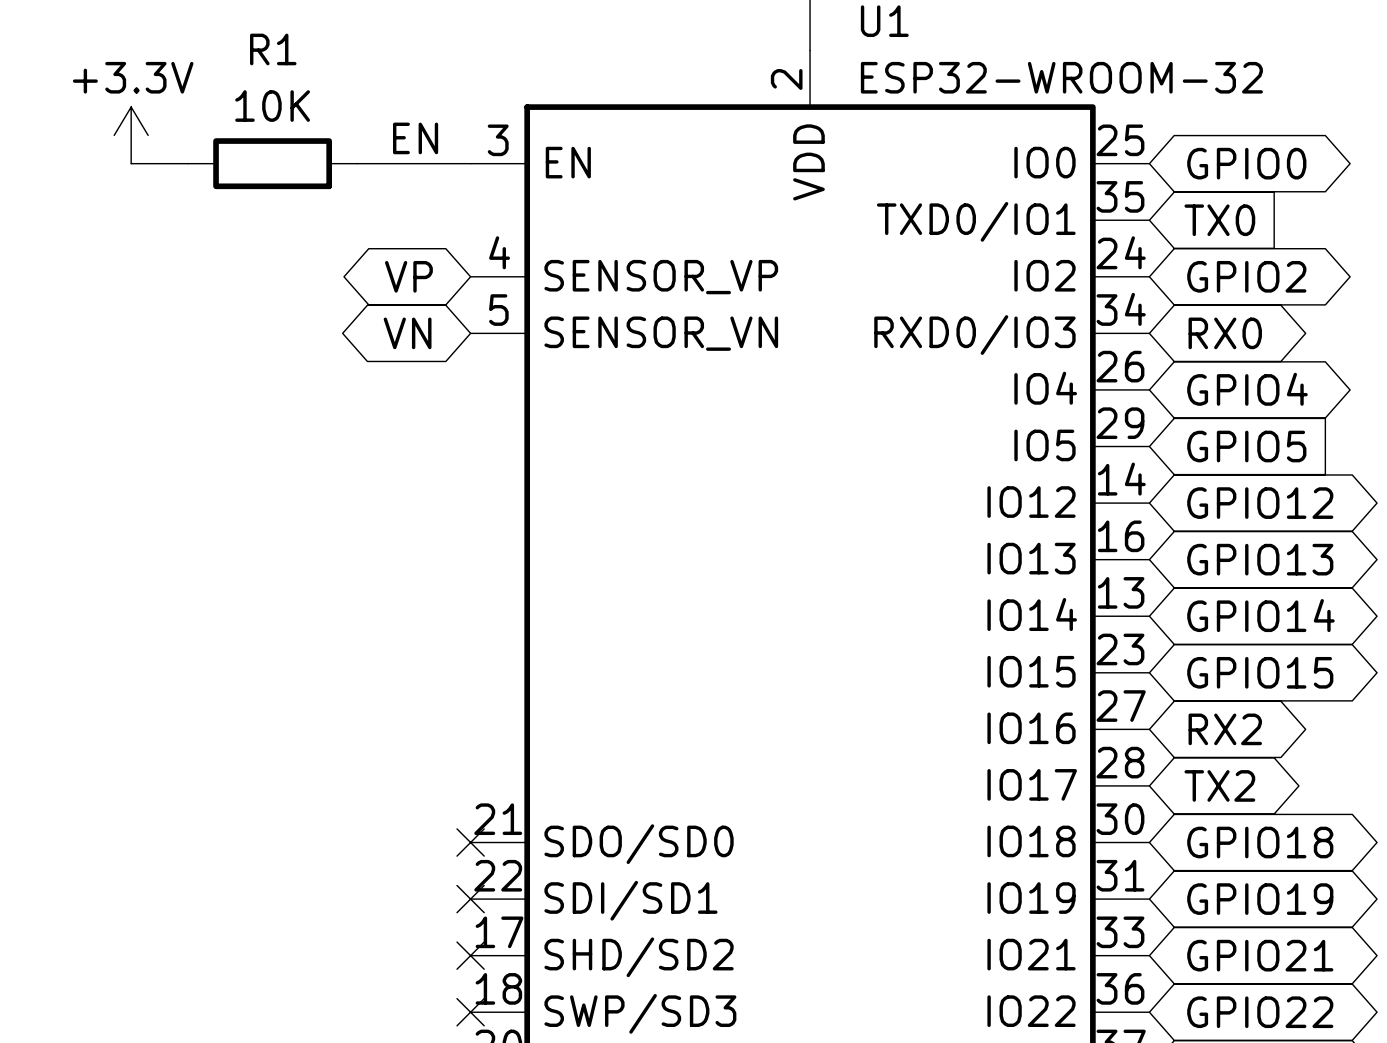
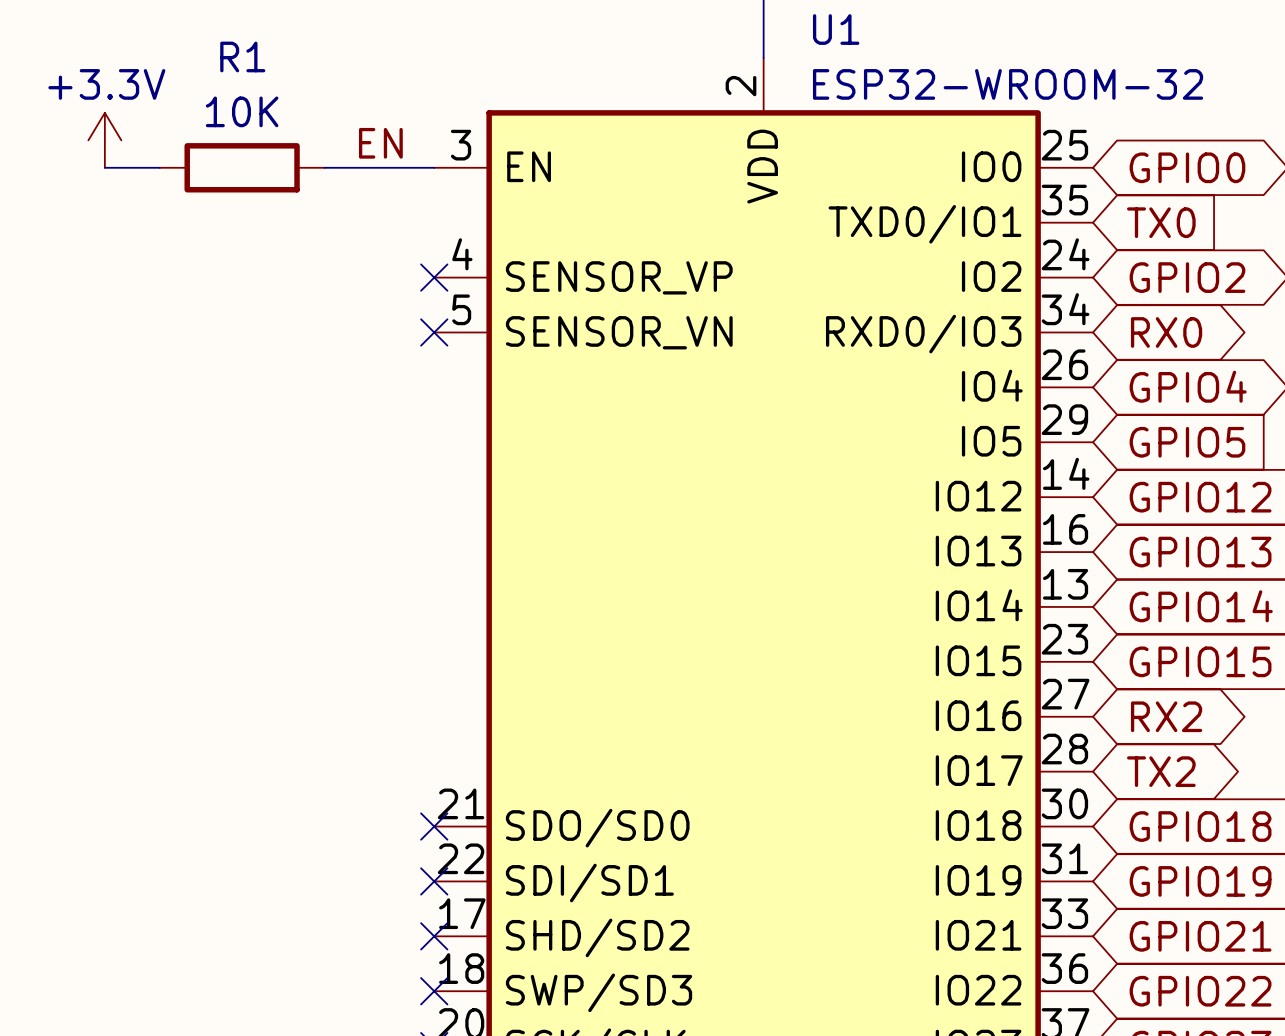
global label: VP (408, 276) -> none
no-connect mark: none -> (434, 277)
global label: VN (407, 333) -> none
no-connect mark: none -> (434, 332)

